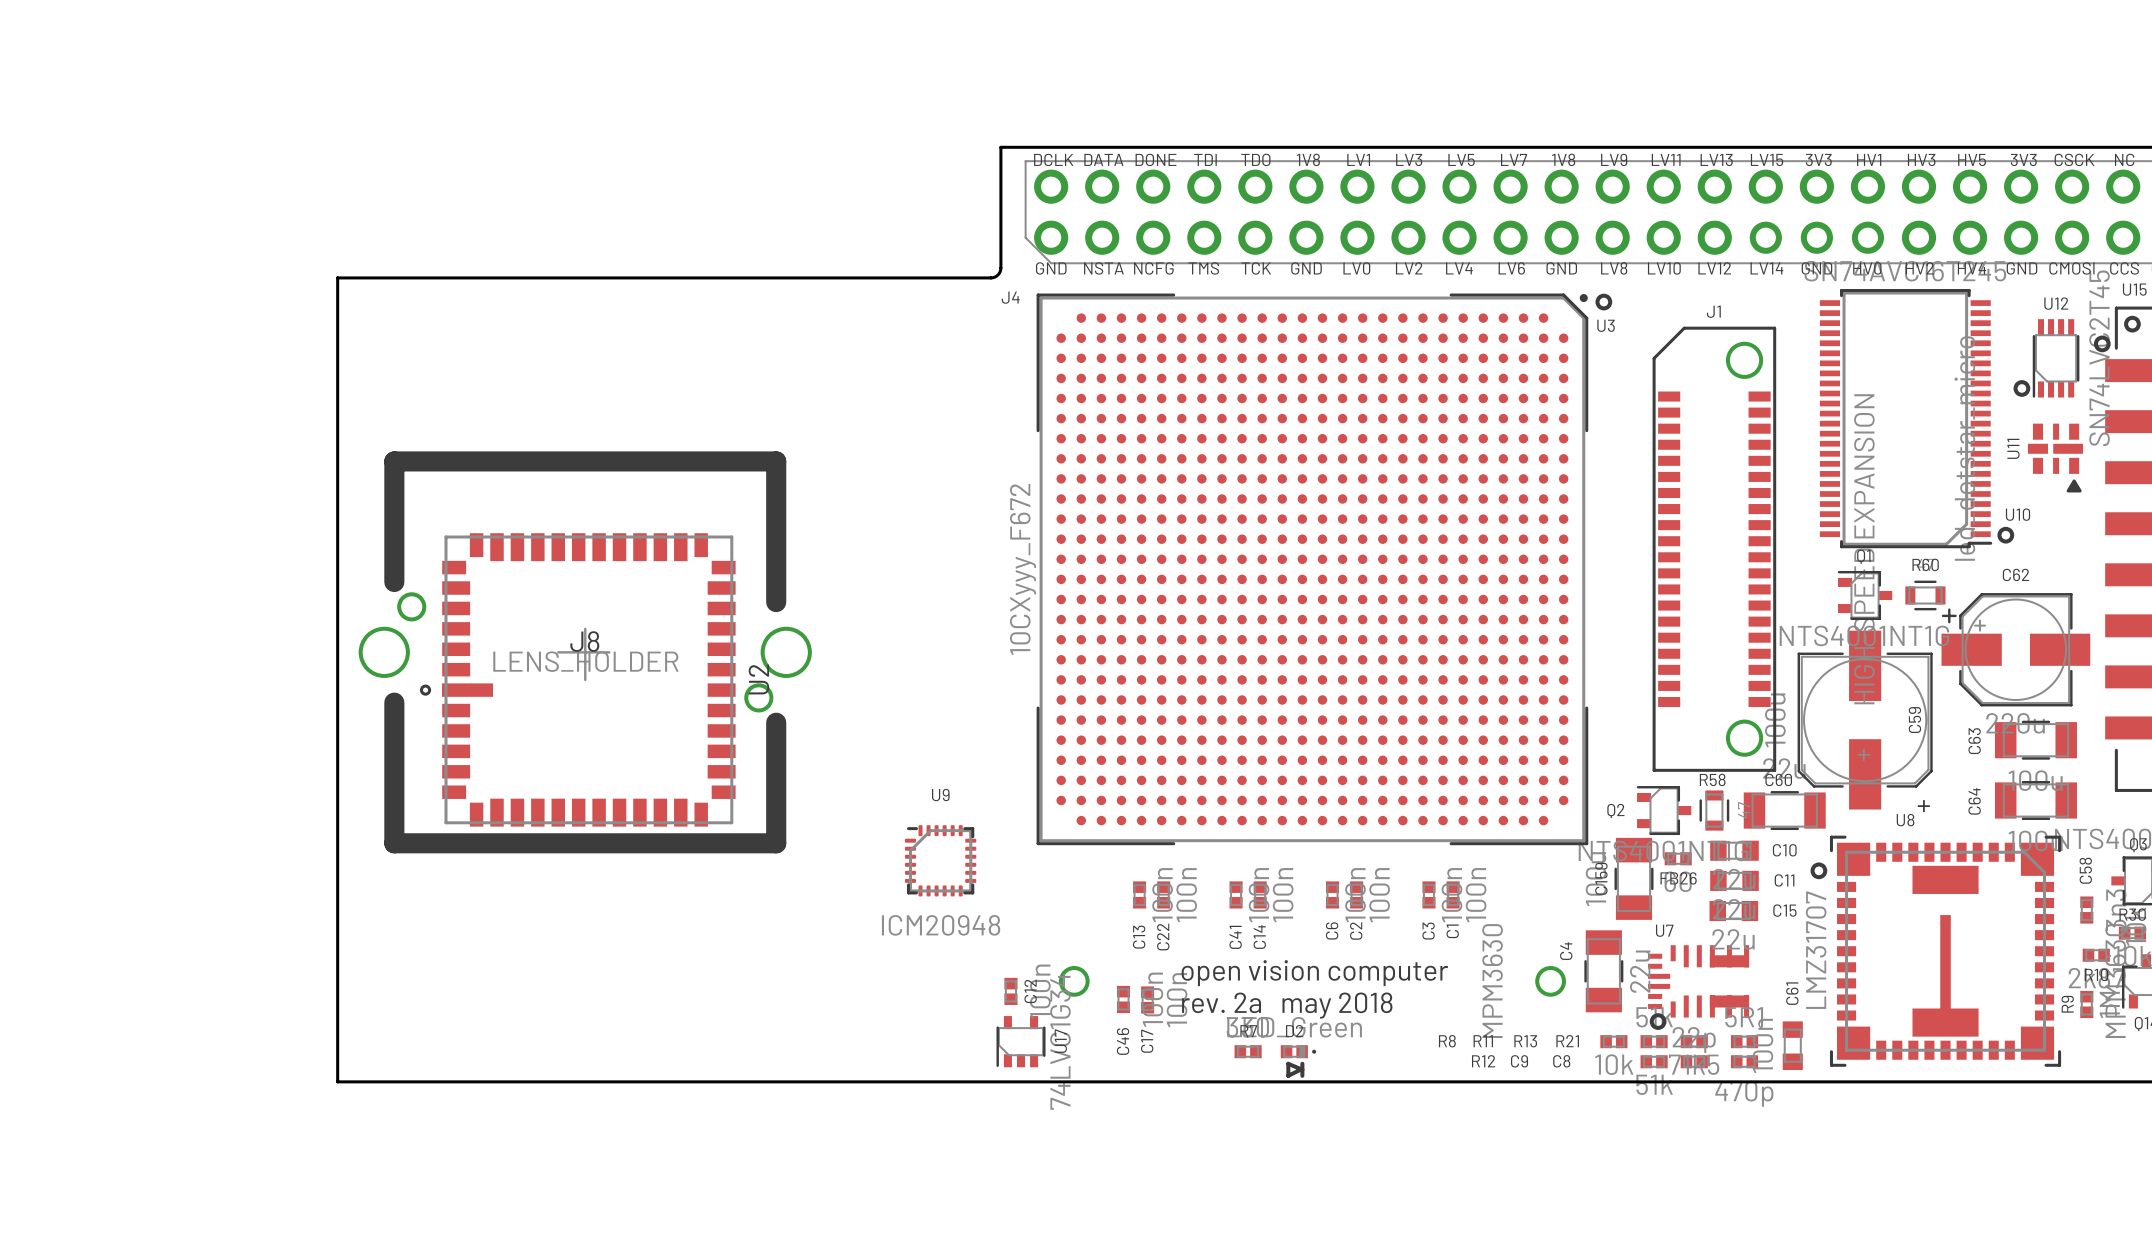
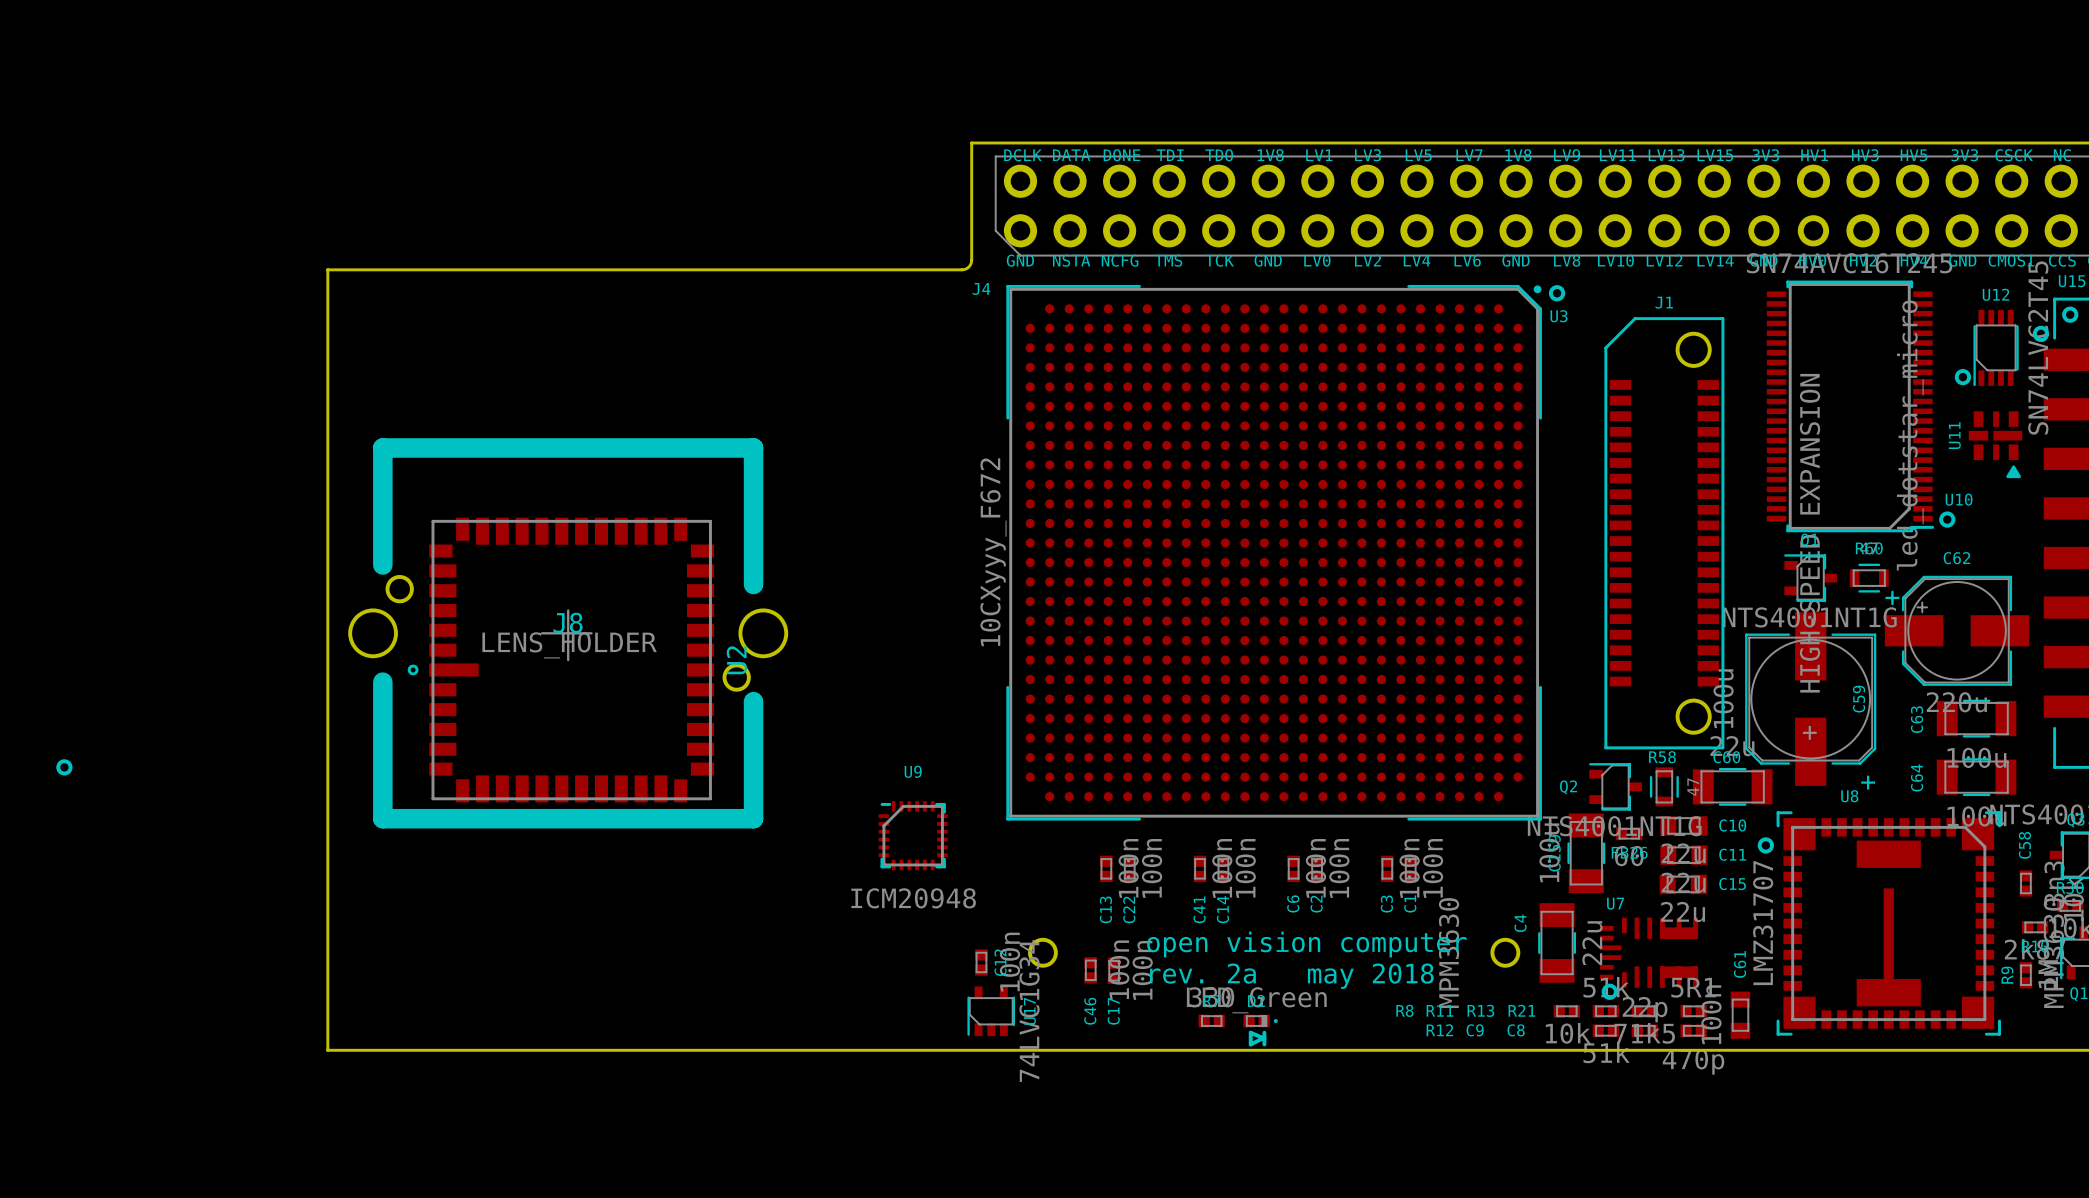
drawing: none -> [56, 759, 73, 776]

